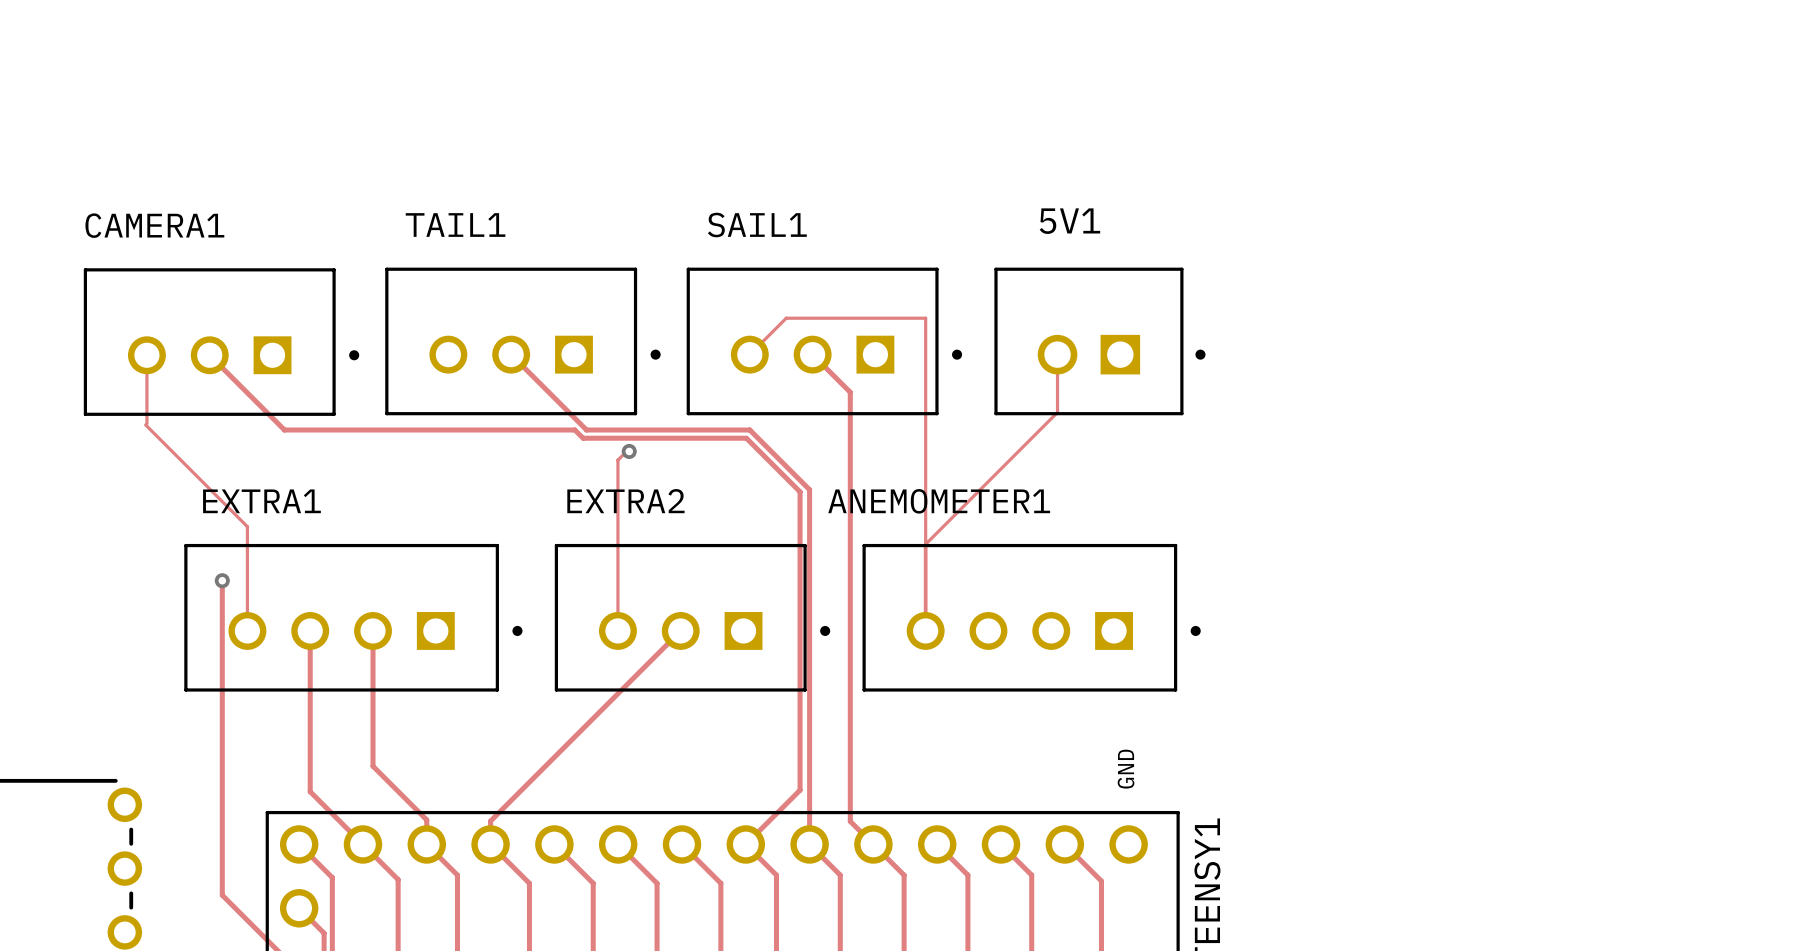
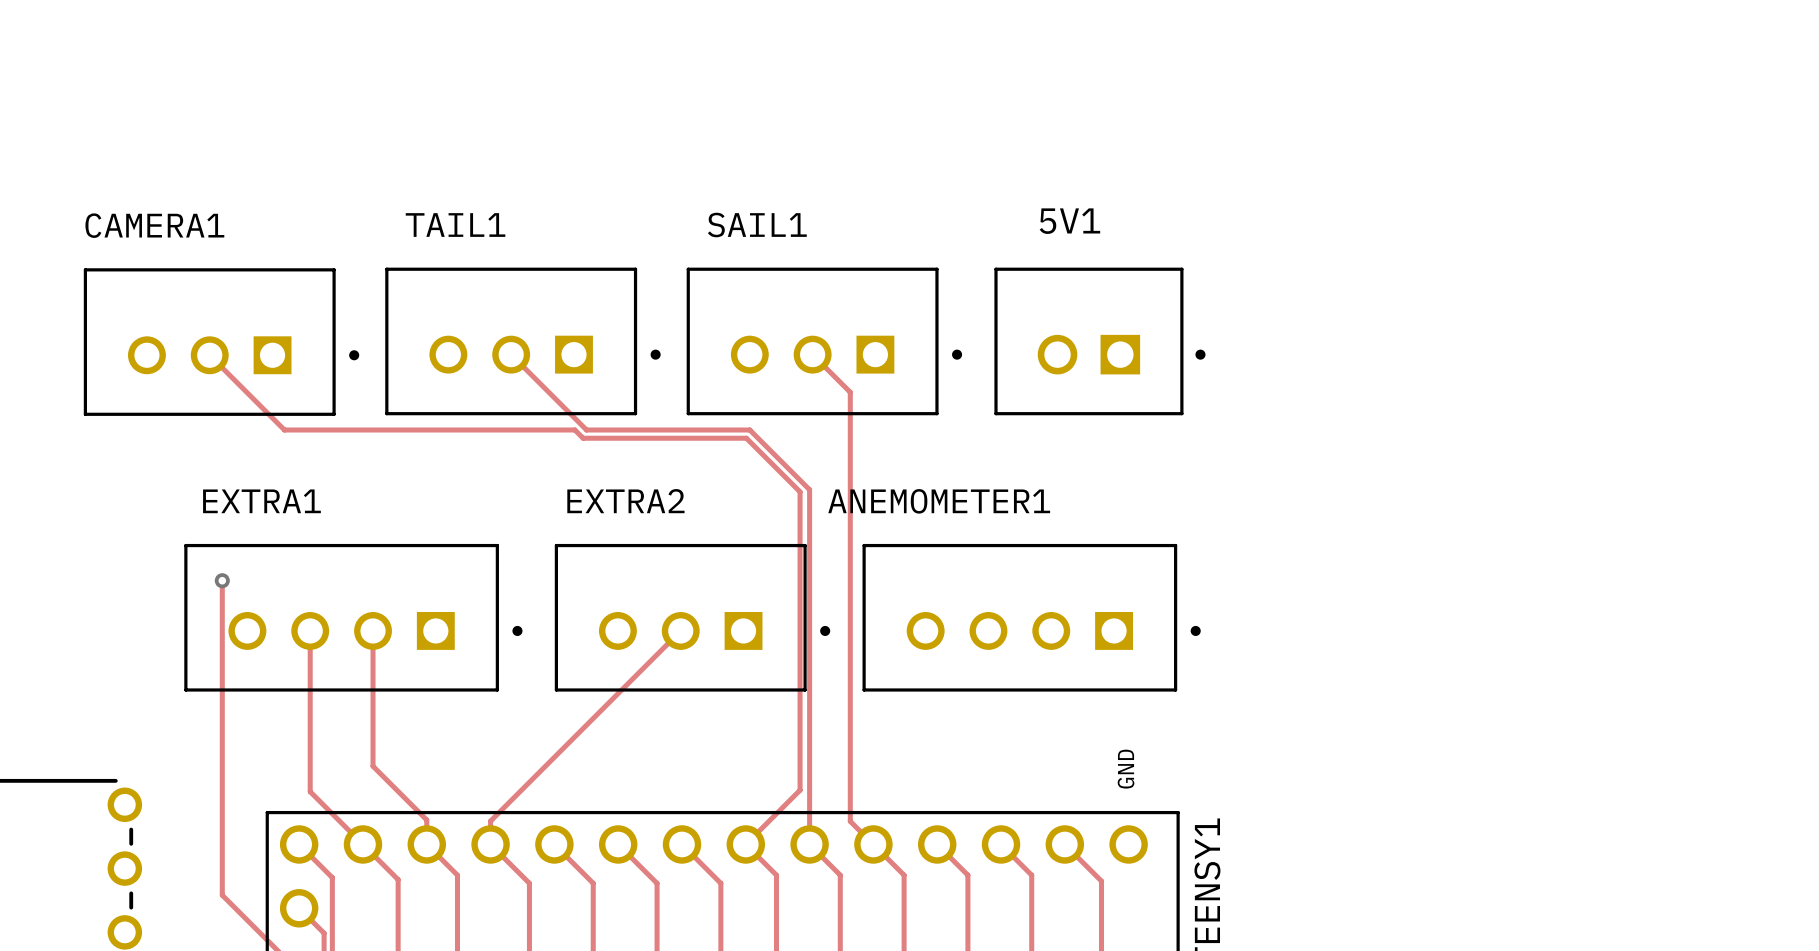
track: (749, 354) (786, 318) (925, 318) (925, 630) -> none
track: (1057, 354) (1057, 412) (925, 544) -> none
track: (146, 355) (146, 423) -> none
track: (145, 424) (247, 526) (247, 630) -> none
track: (629, 451) (629, 448) (617, 460) (617, 630) -> none
via: (629, 451) -> none

